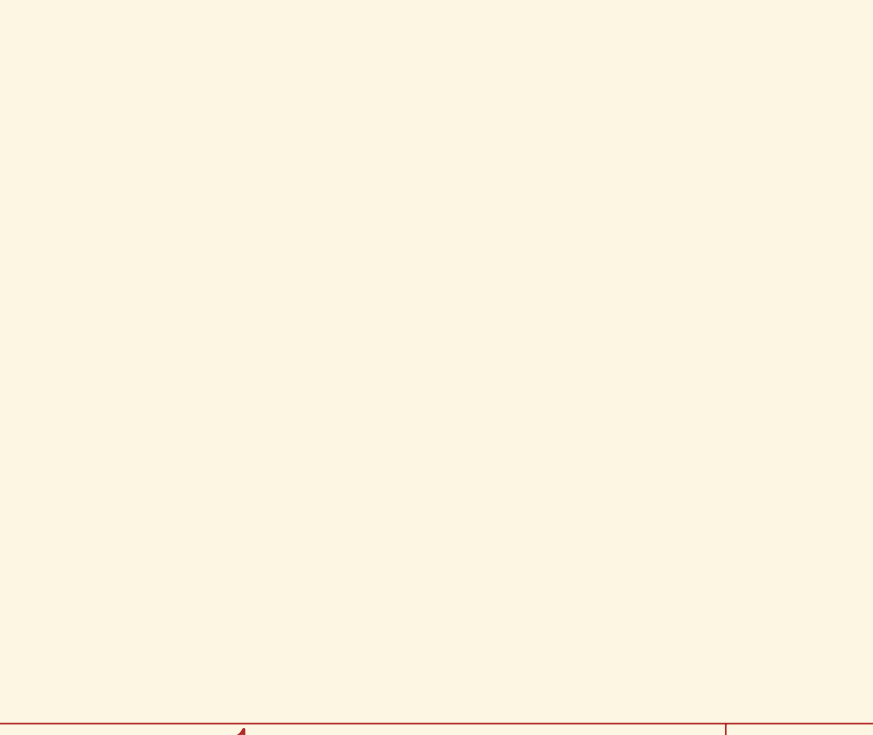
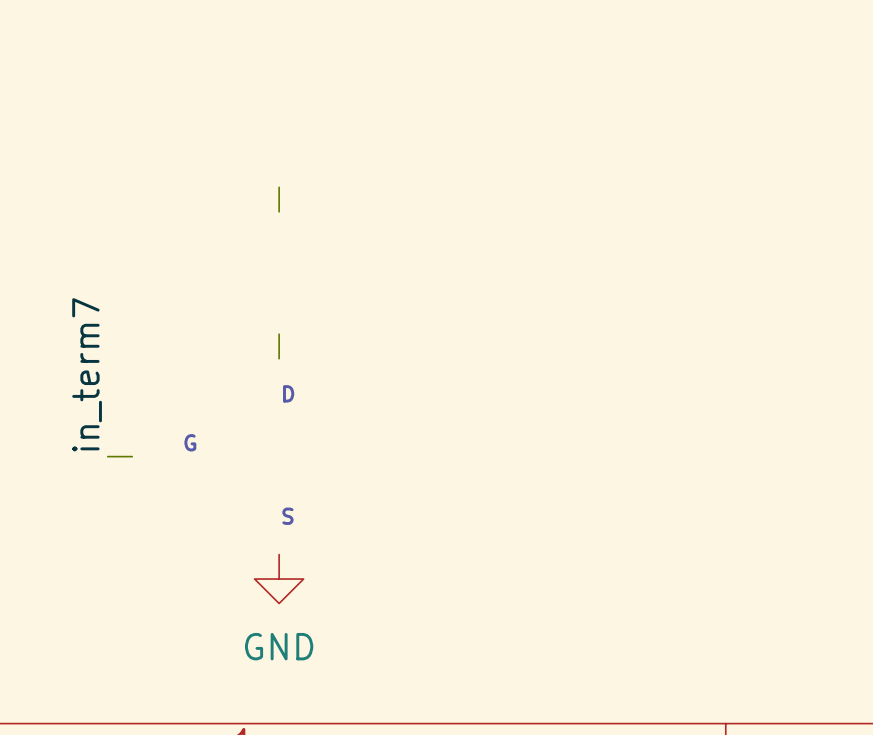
wire: none -> (279, 187) (279, 211)
wire: none -> (279, 334) (279, 358)
label: none -> in_term7 (87, 374)
text: none -> D (288, 393)
text: none -> G (190, 442)
wire: none -> (107, 456) (132, 456)
text: none -> S (287, 516)
power symbol: none -> GND (279, 579)

